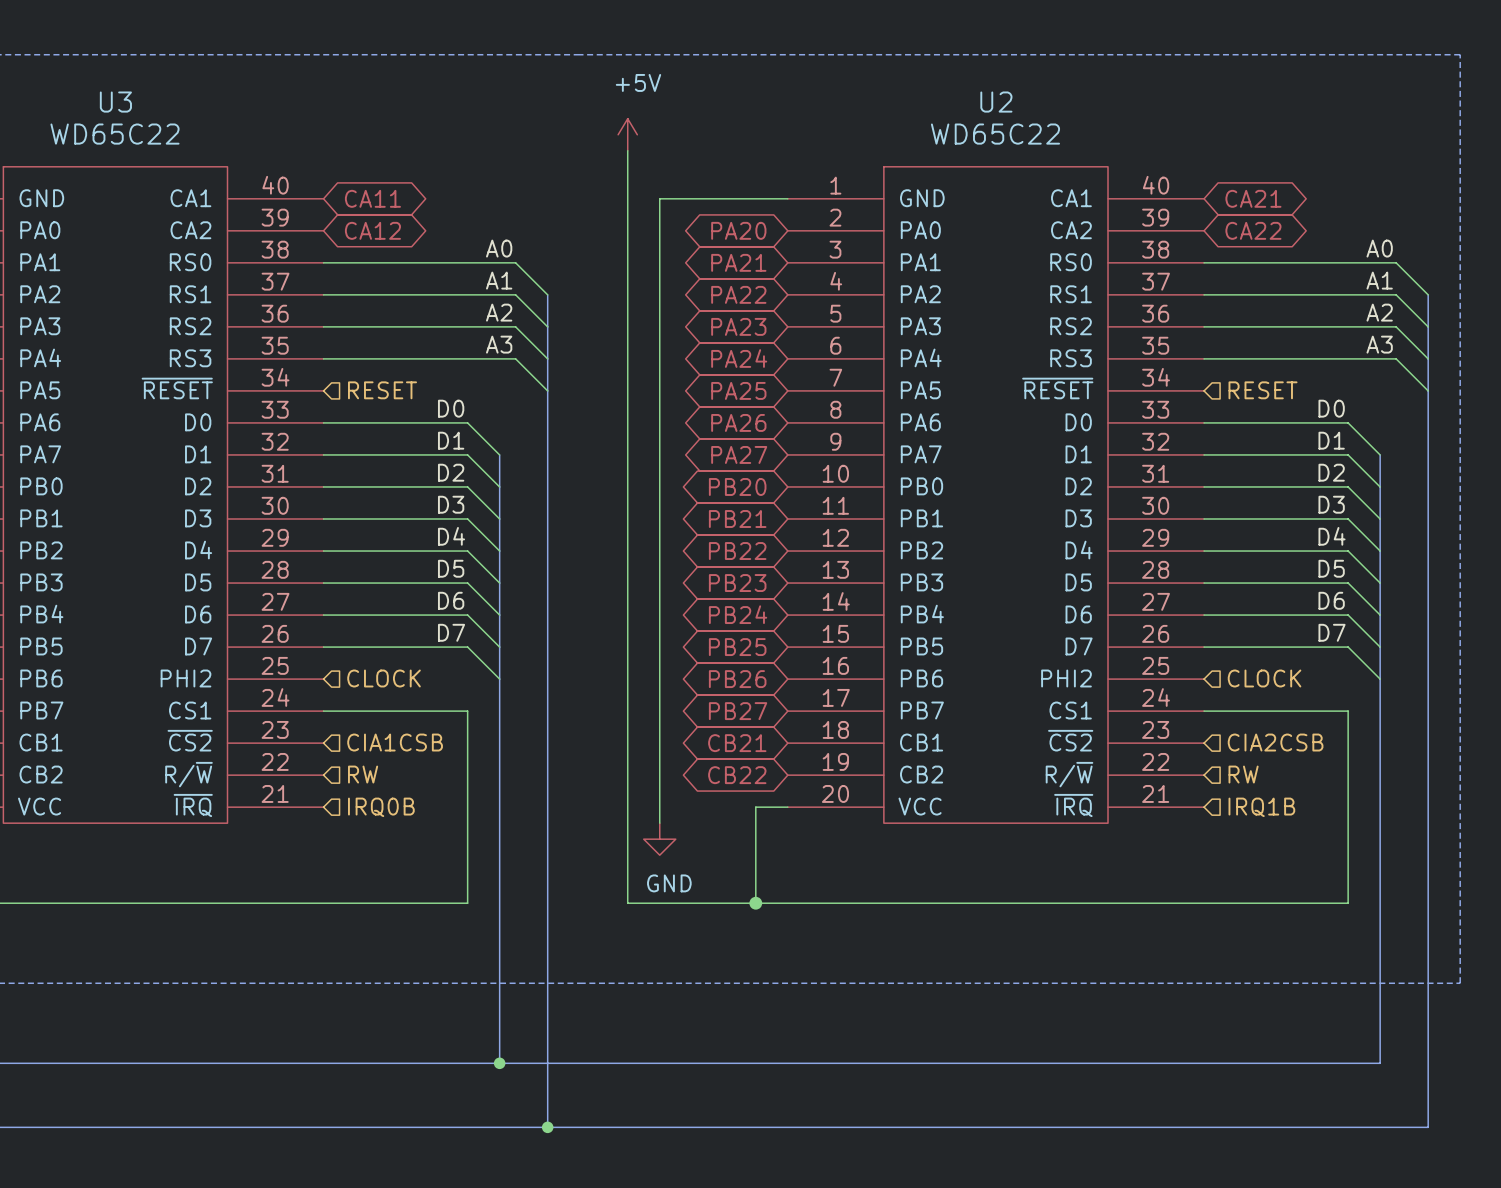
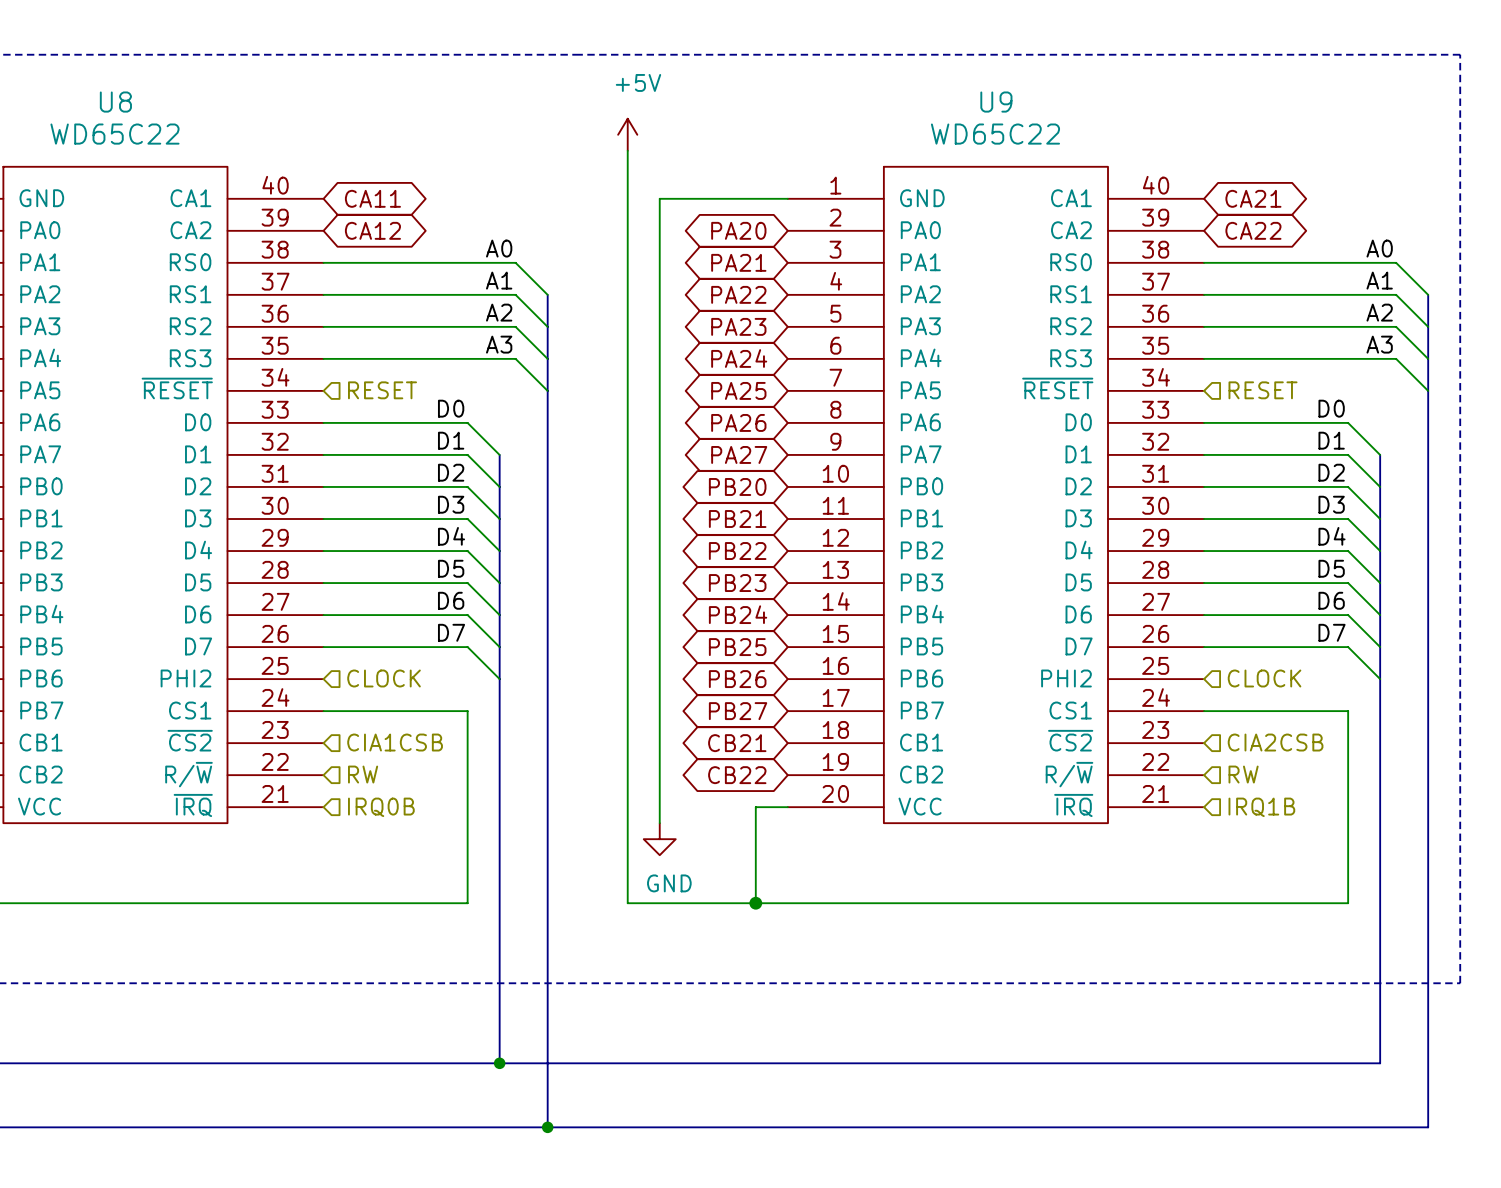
U3 name: U3 (115, 102) -> U8 (115, 102)
U2 name: U2 (996, 102) -> U9 (996, 102)

